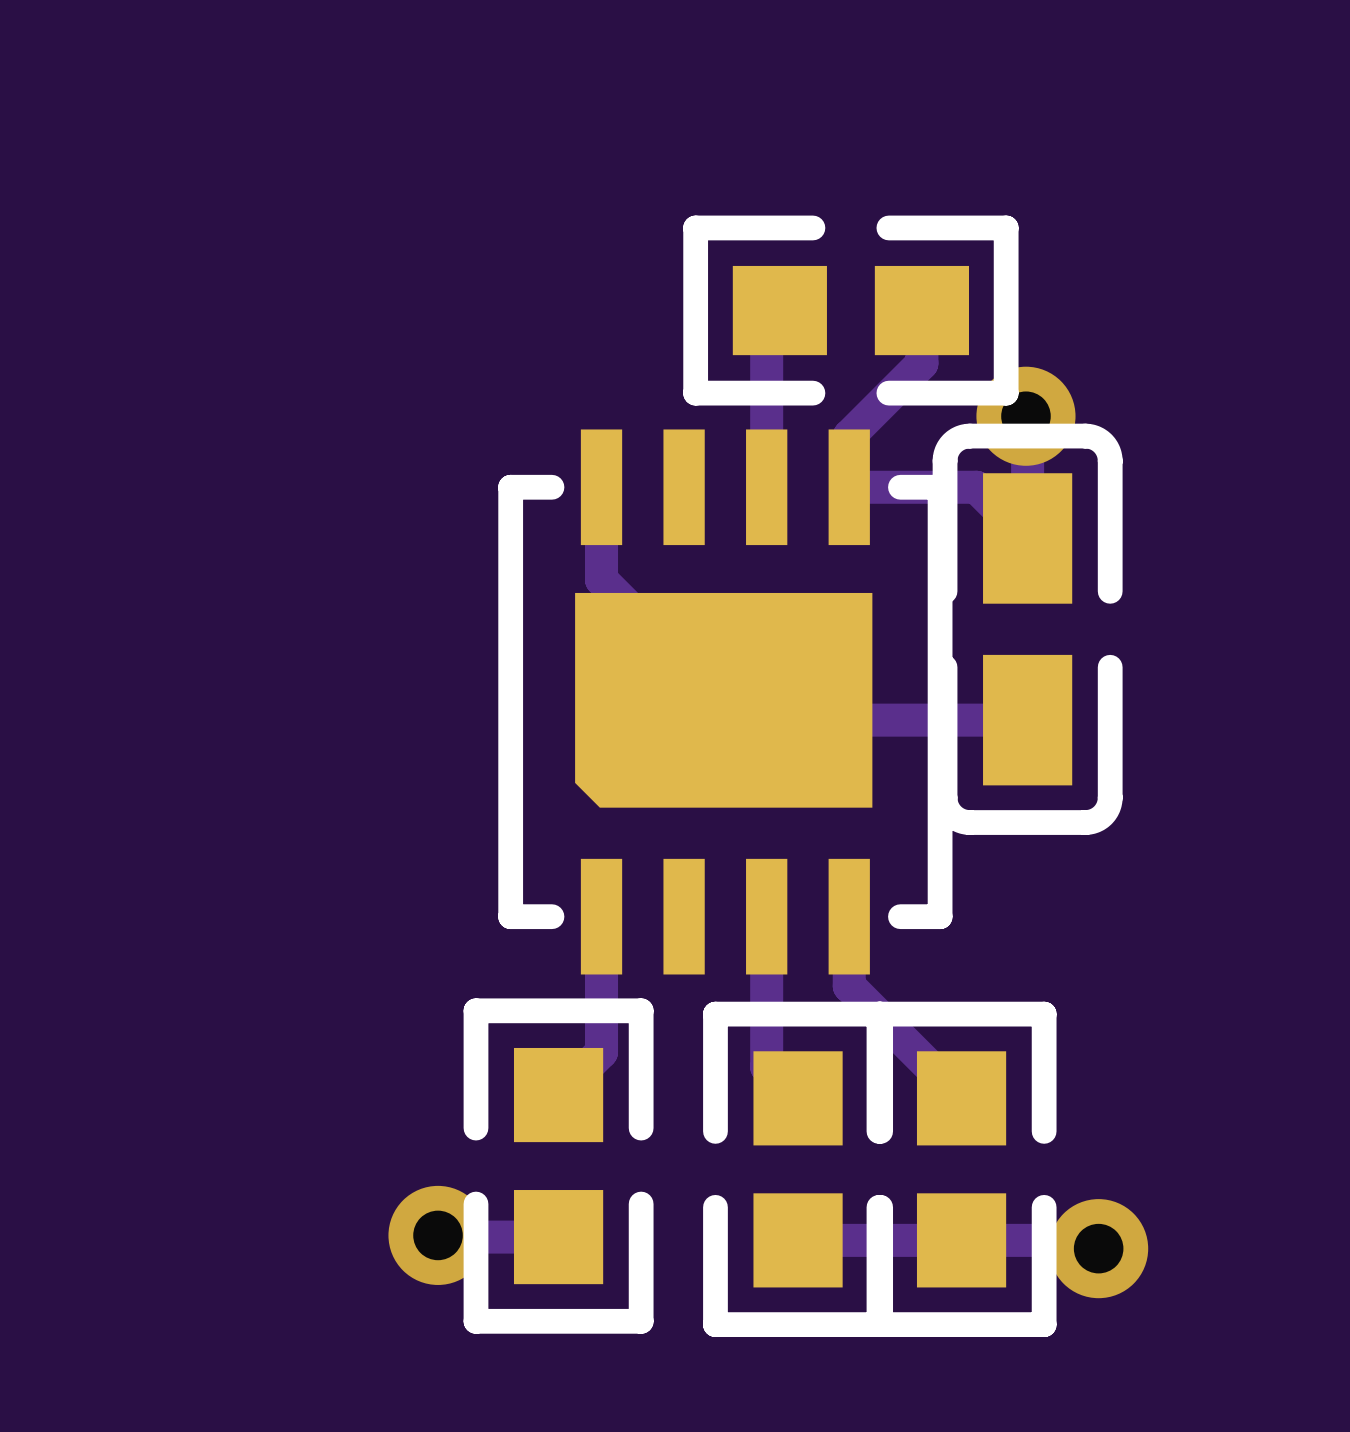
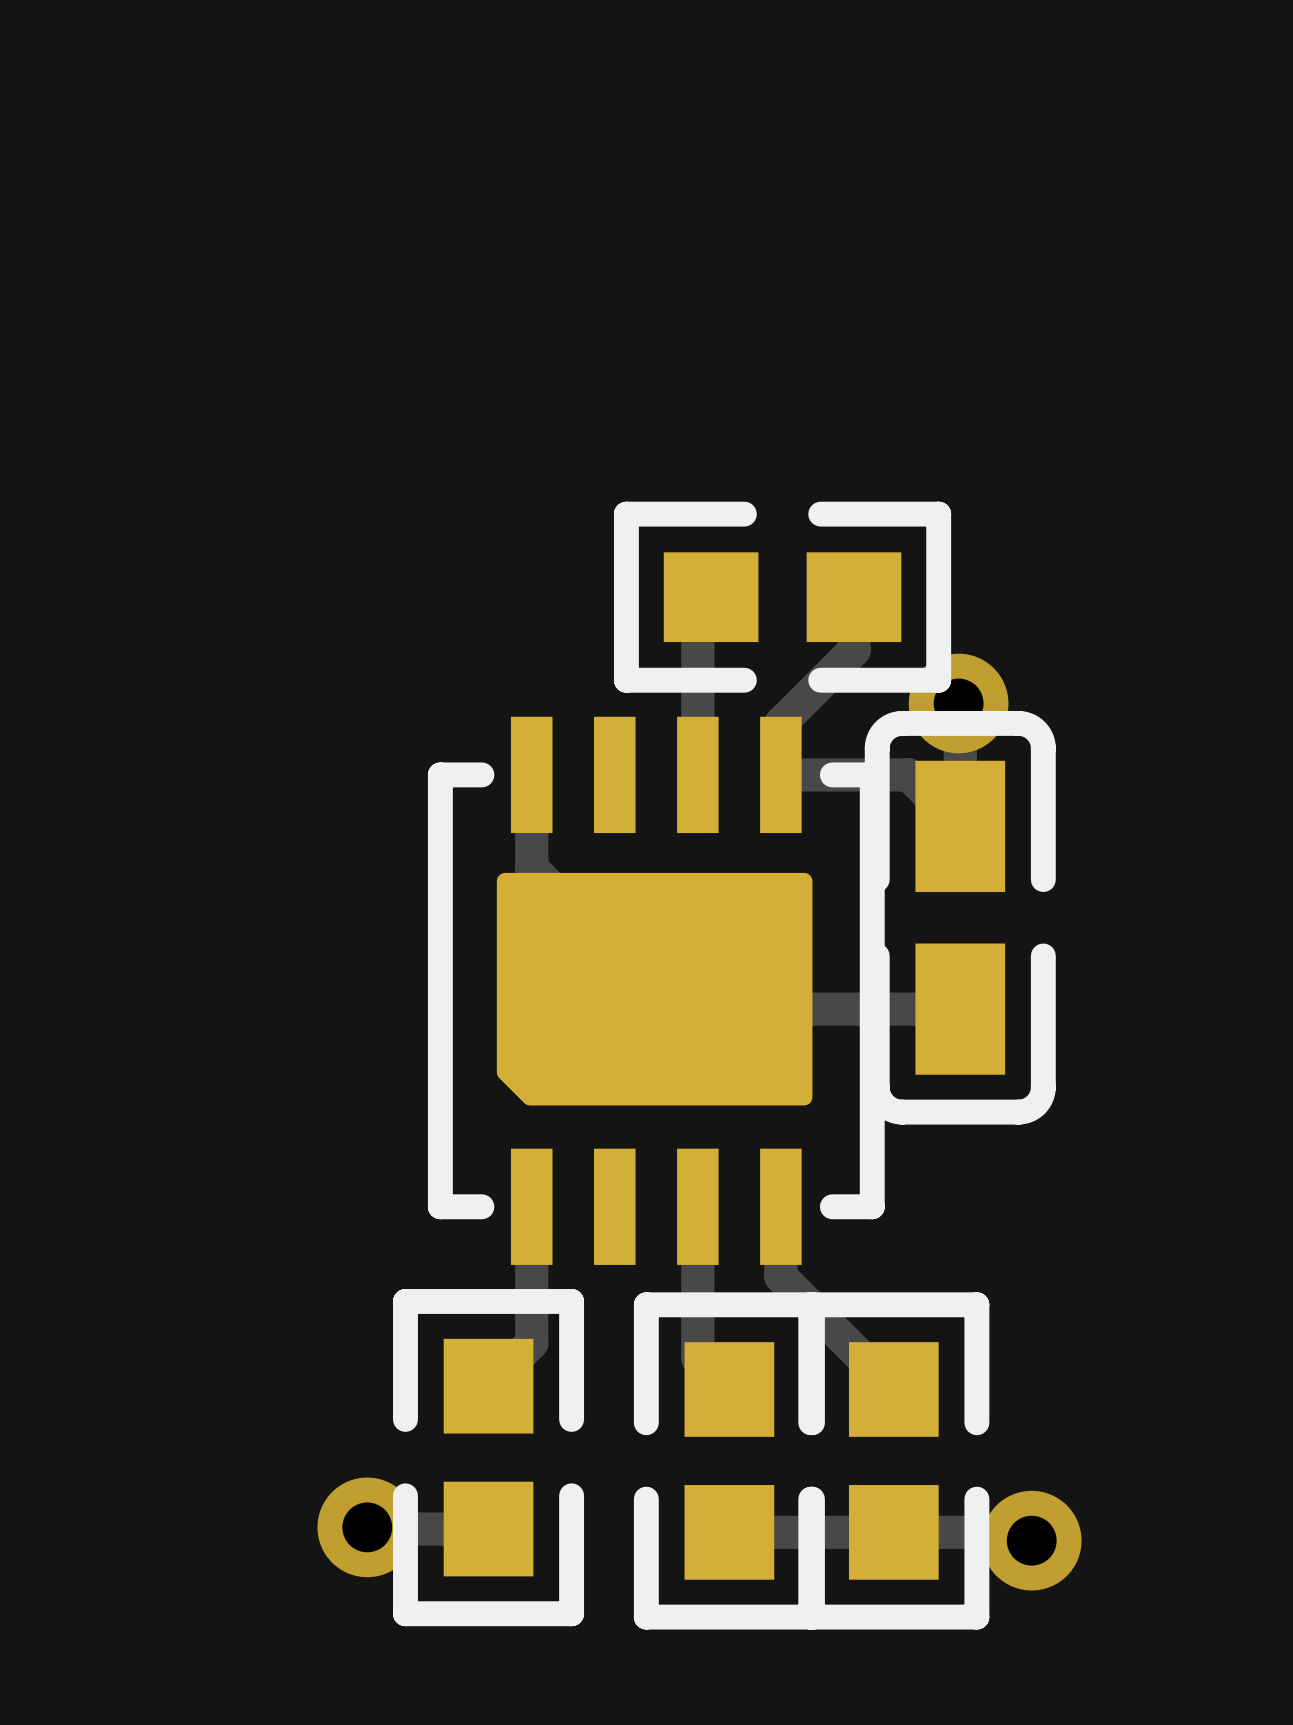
part footprint: [492, 429, 953, 988] -> [422, 716, 885, 1279]

